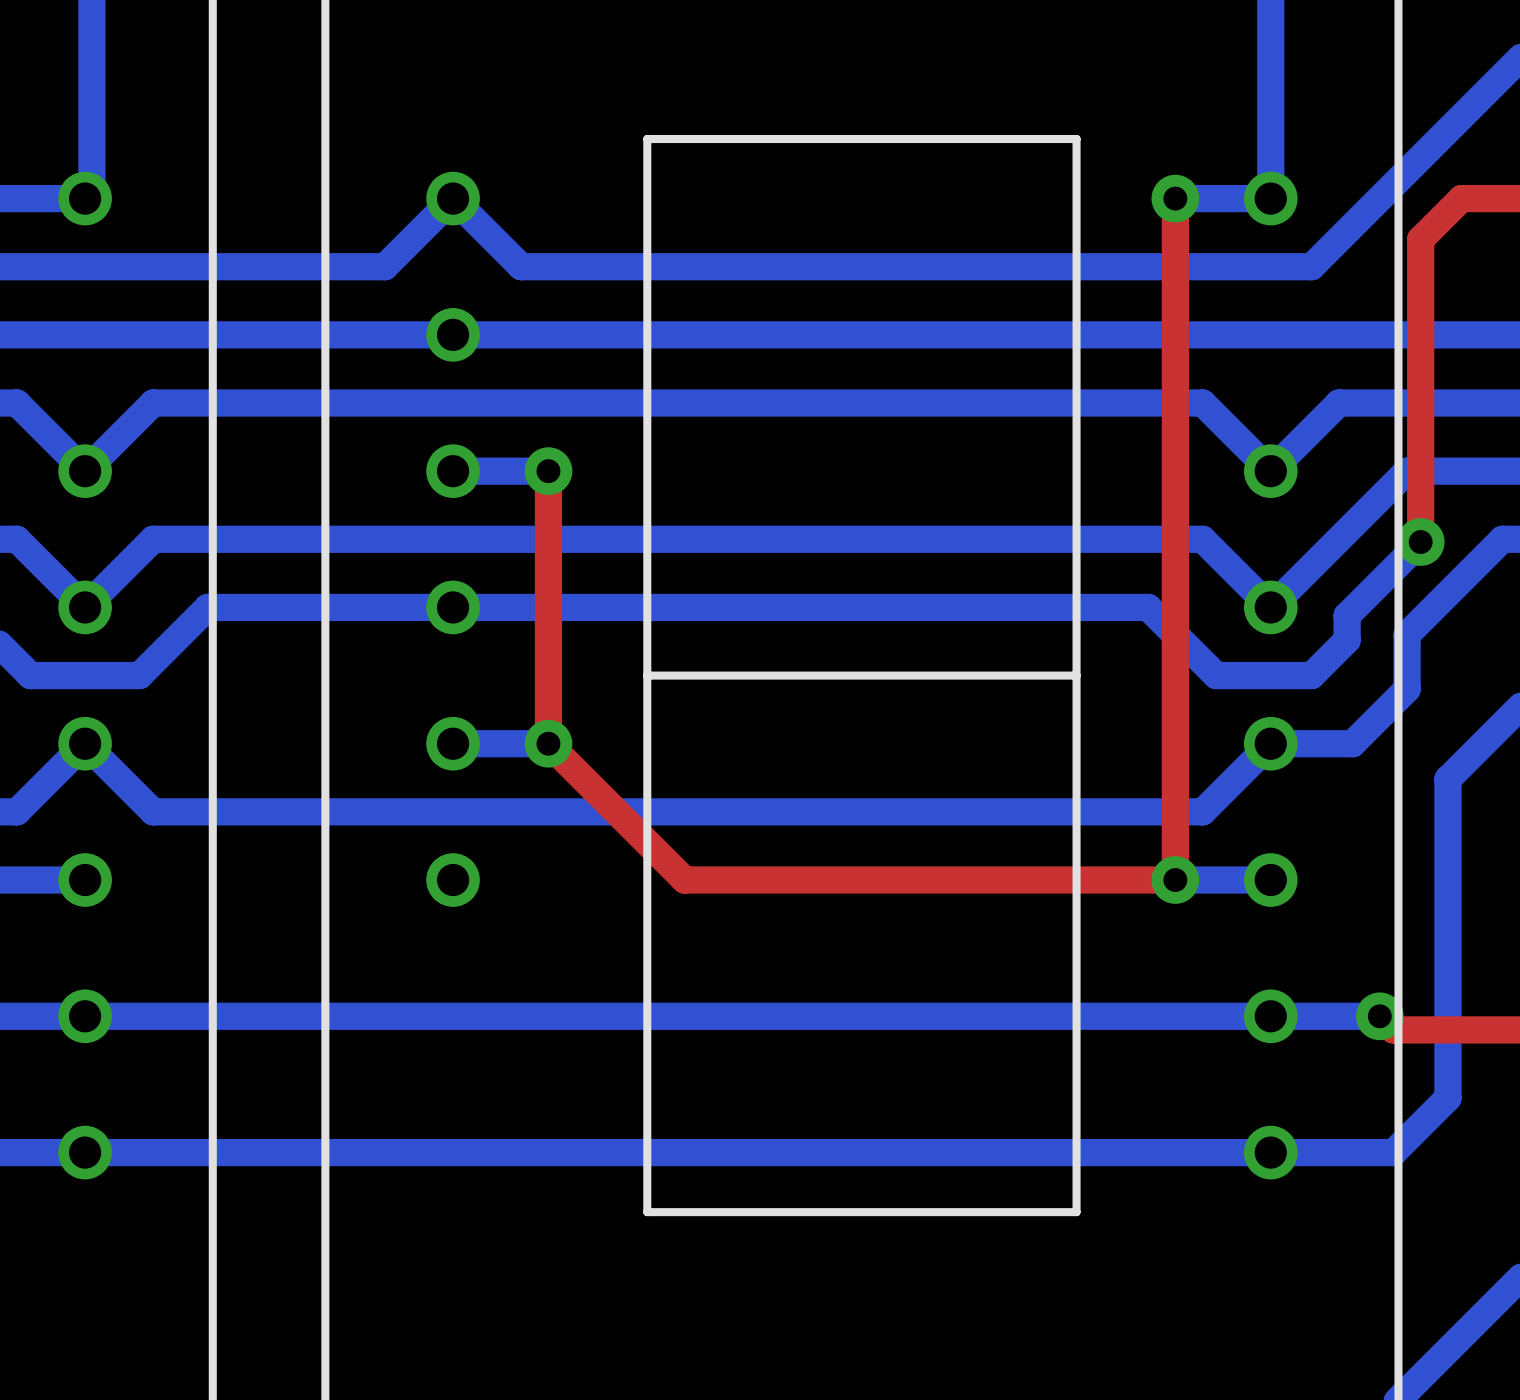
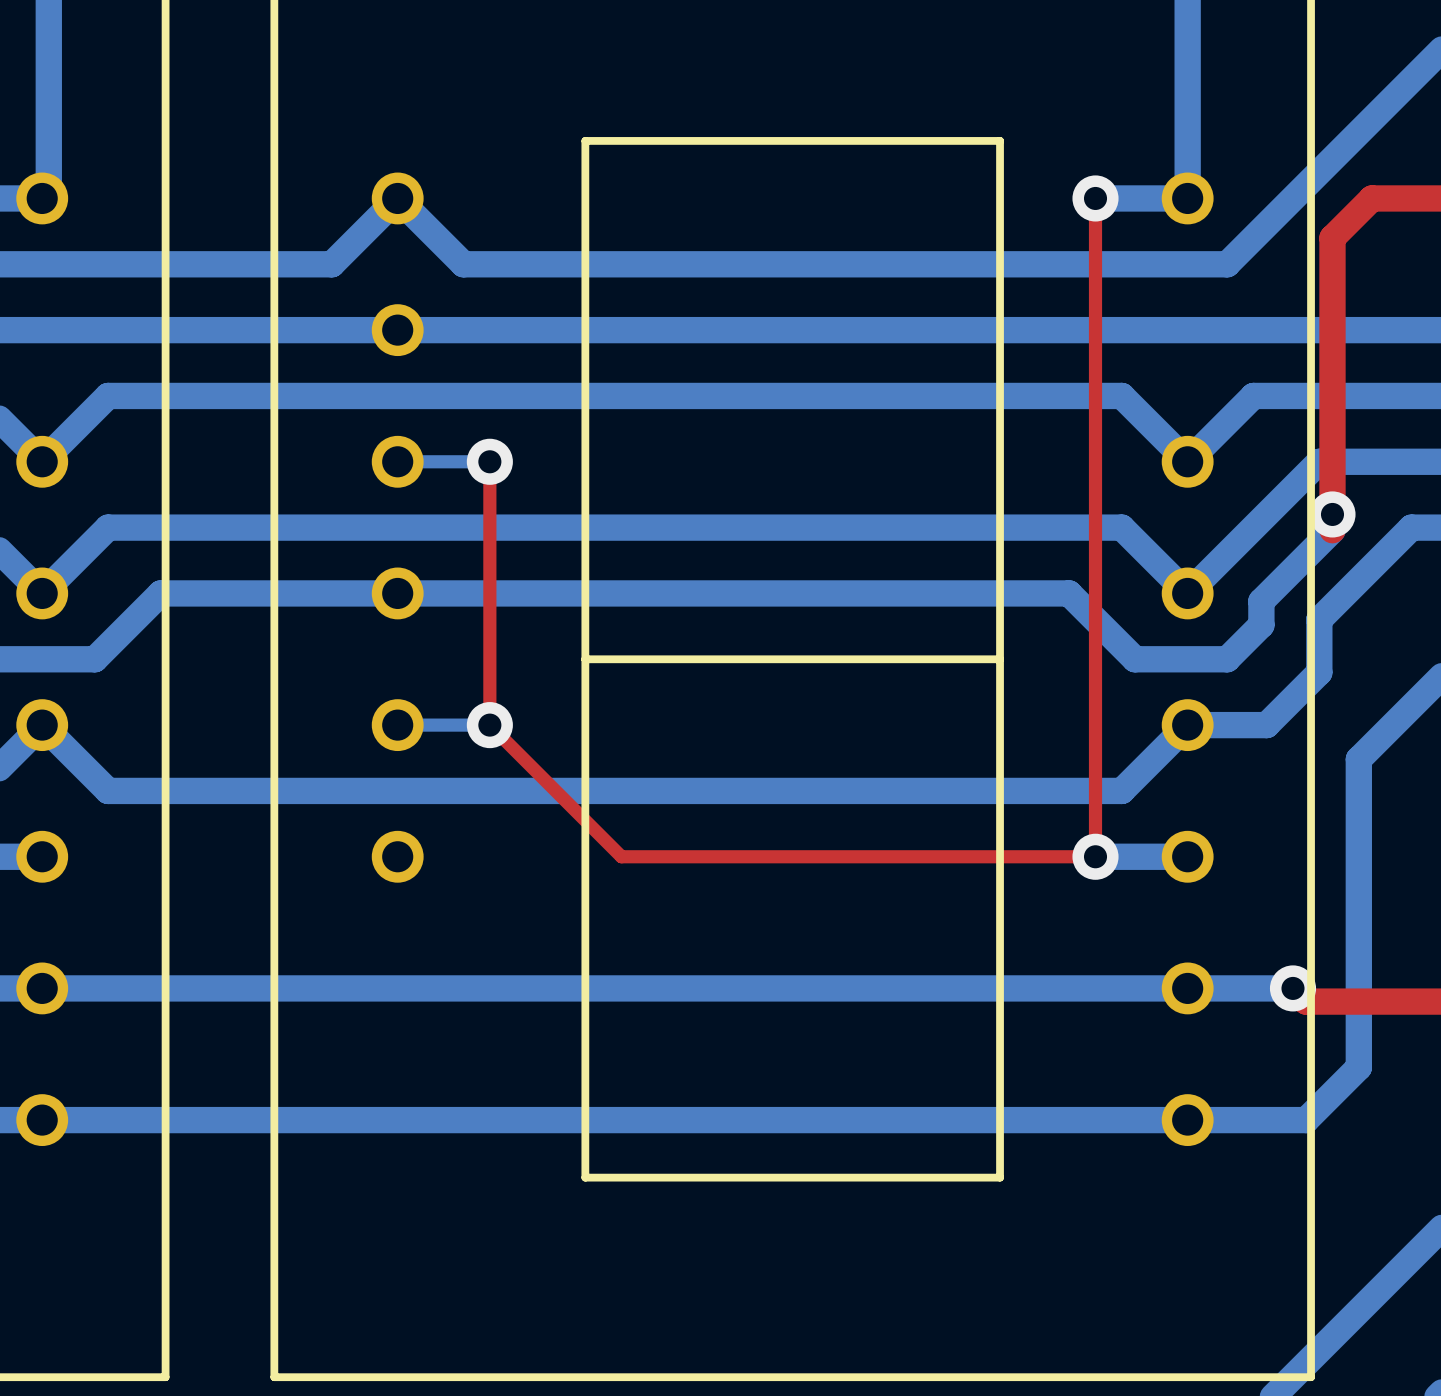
top track width: thick (1175, 198) (1175, 880) (684, 880) (548, 743) (548, 471) -> thin (1095, 198) (1095, 856) (621, 856) (489, 725) (489, 461)
bottom track width: thick (453, 471) (548, 471) -> thin (397, 461) (489, 461)
via position: (1420, 542) -> (1332, 514)
bottom track width: thick (453, 743) (548, 743) -> thin (397, 725) (489, 725)

